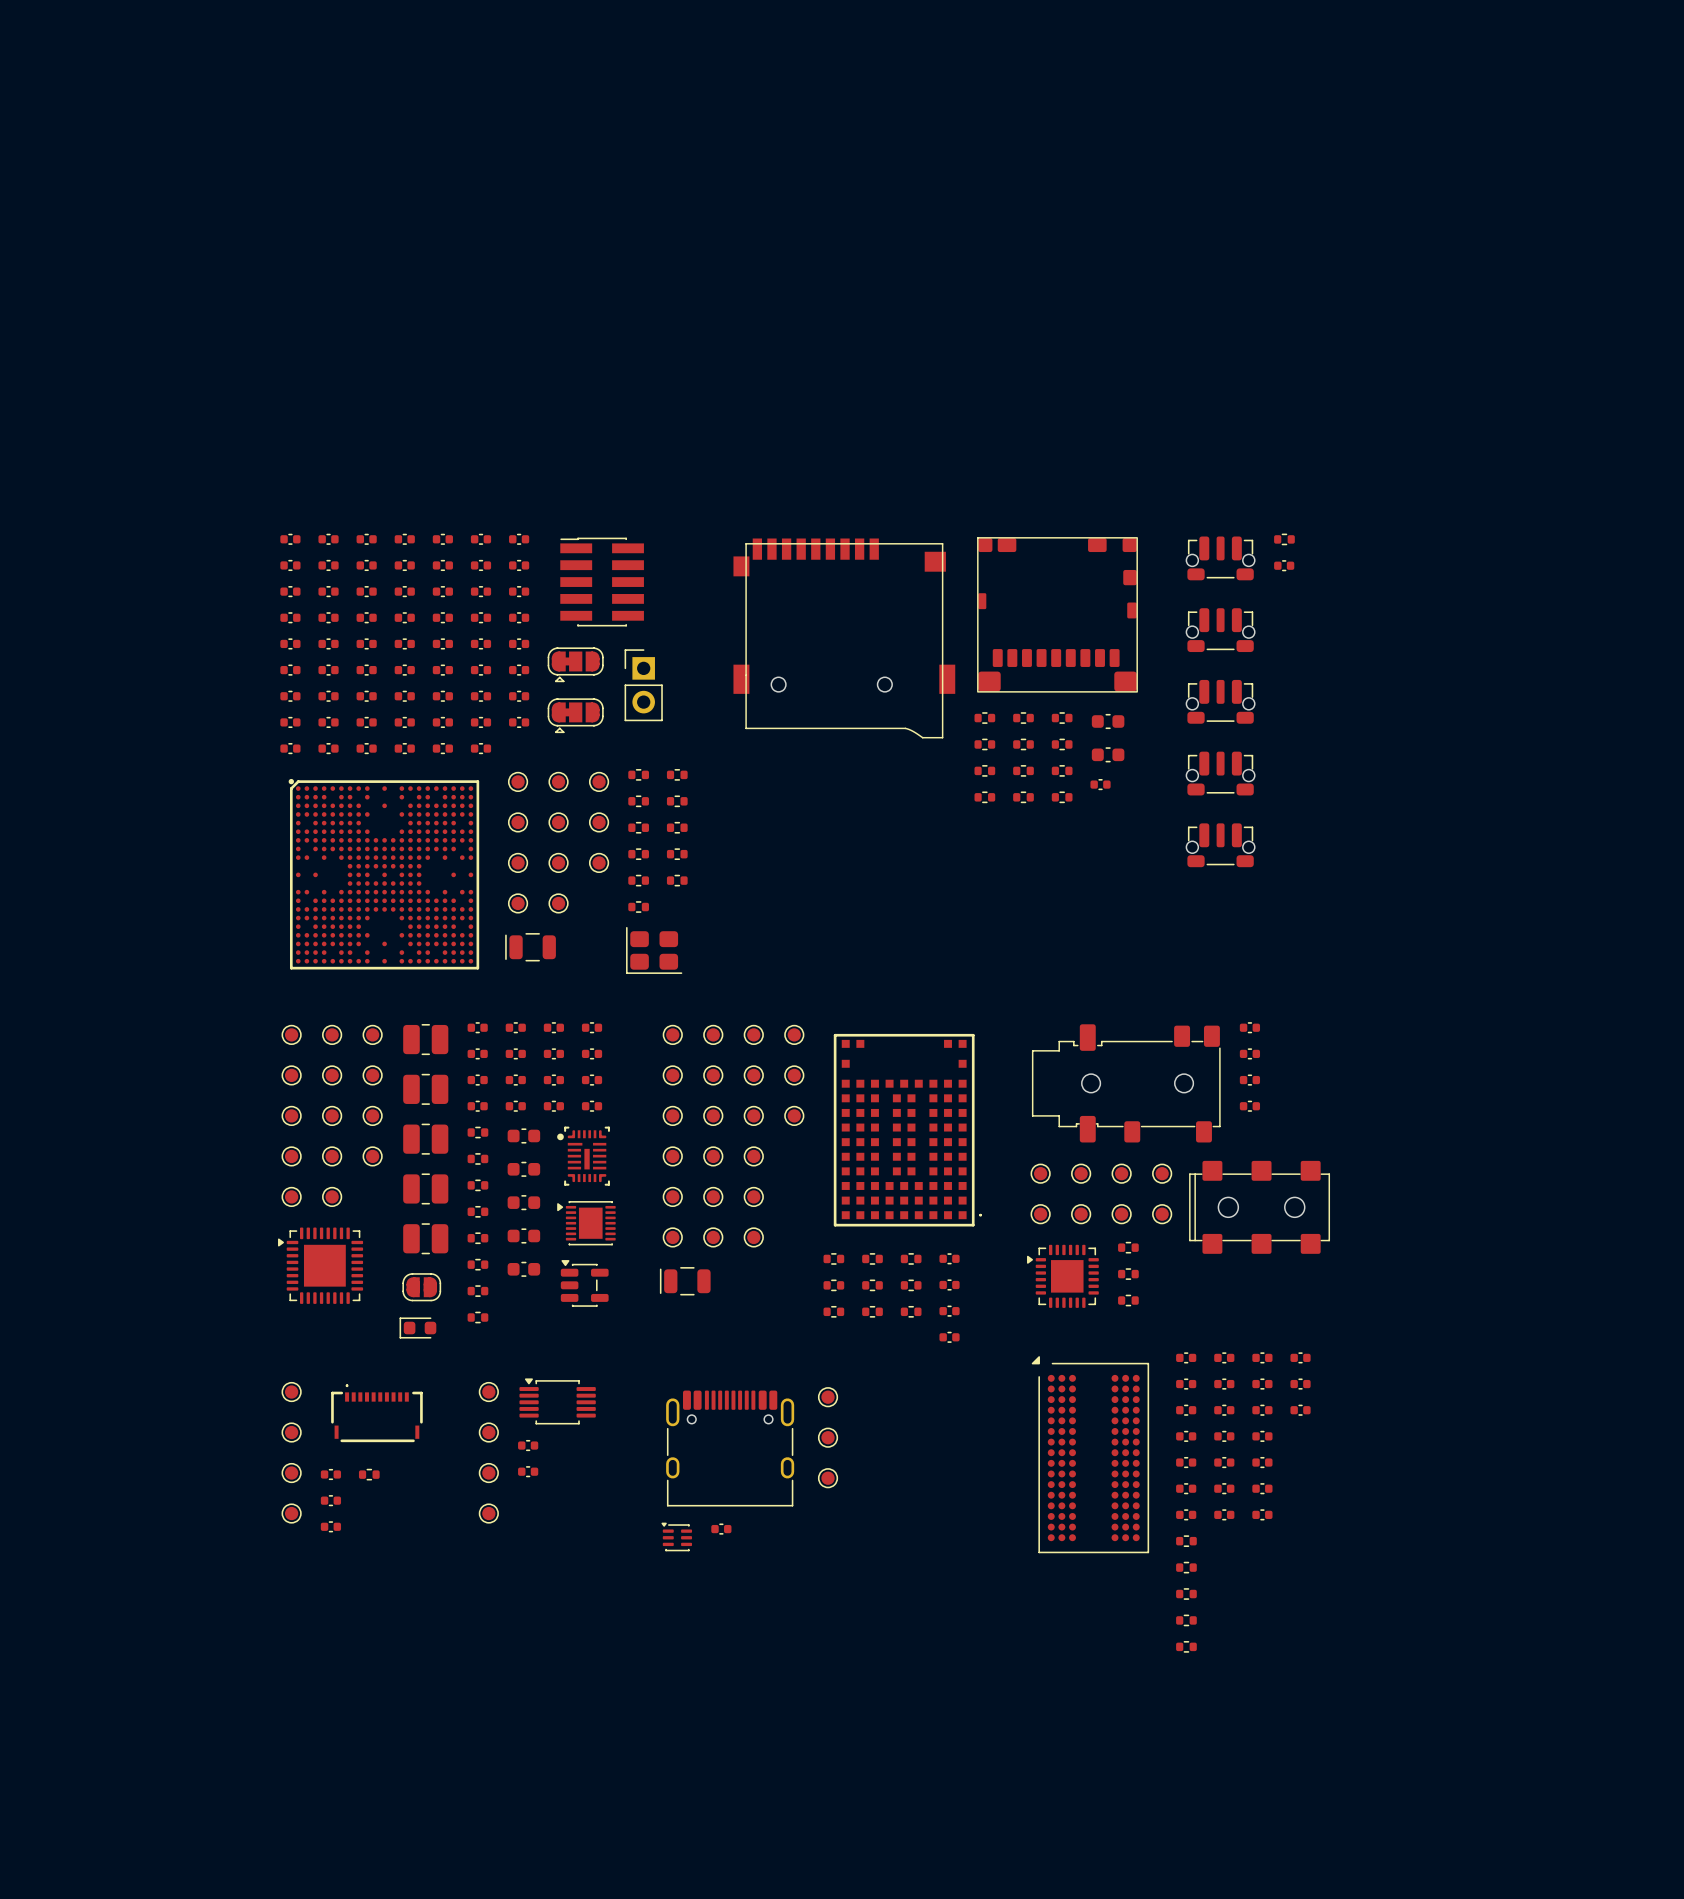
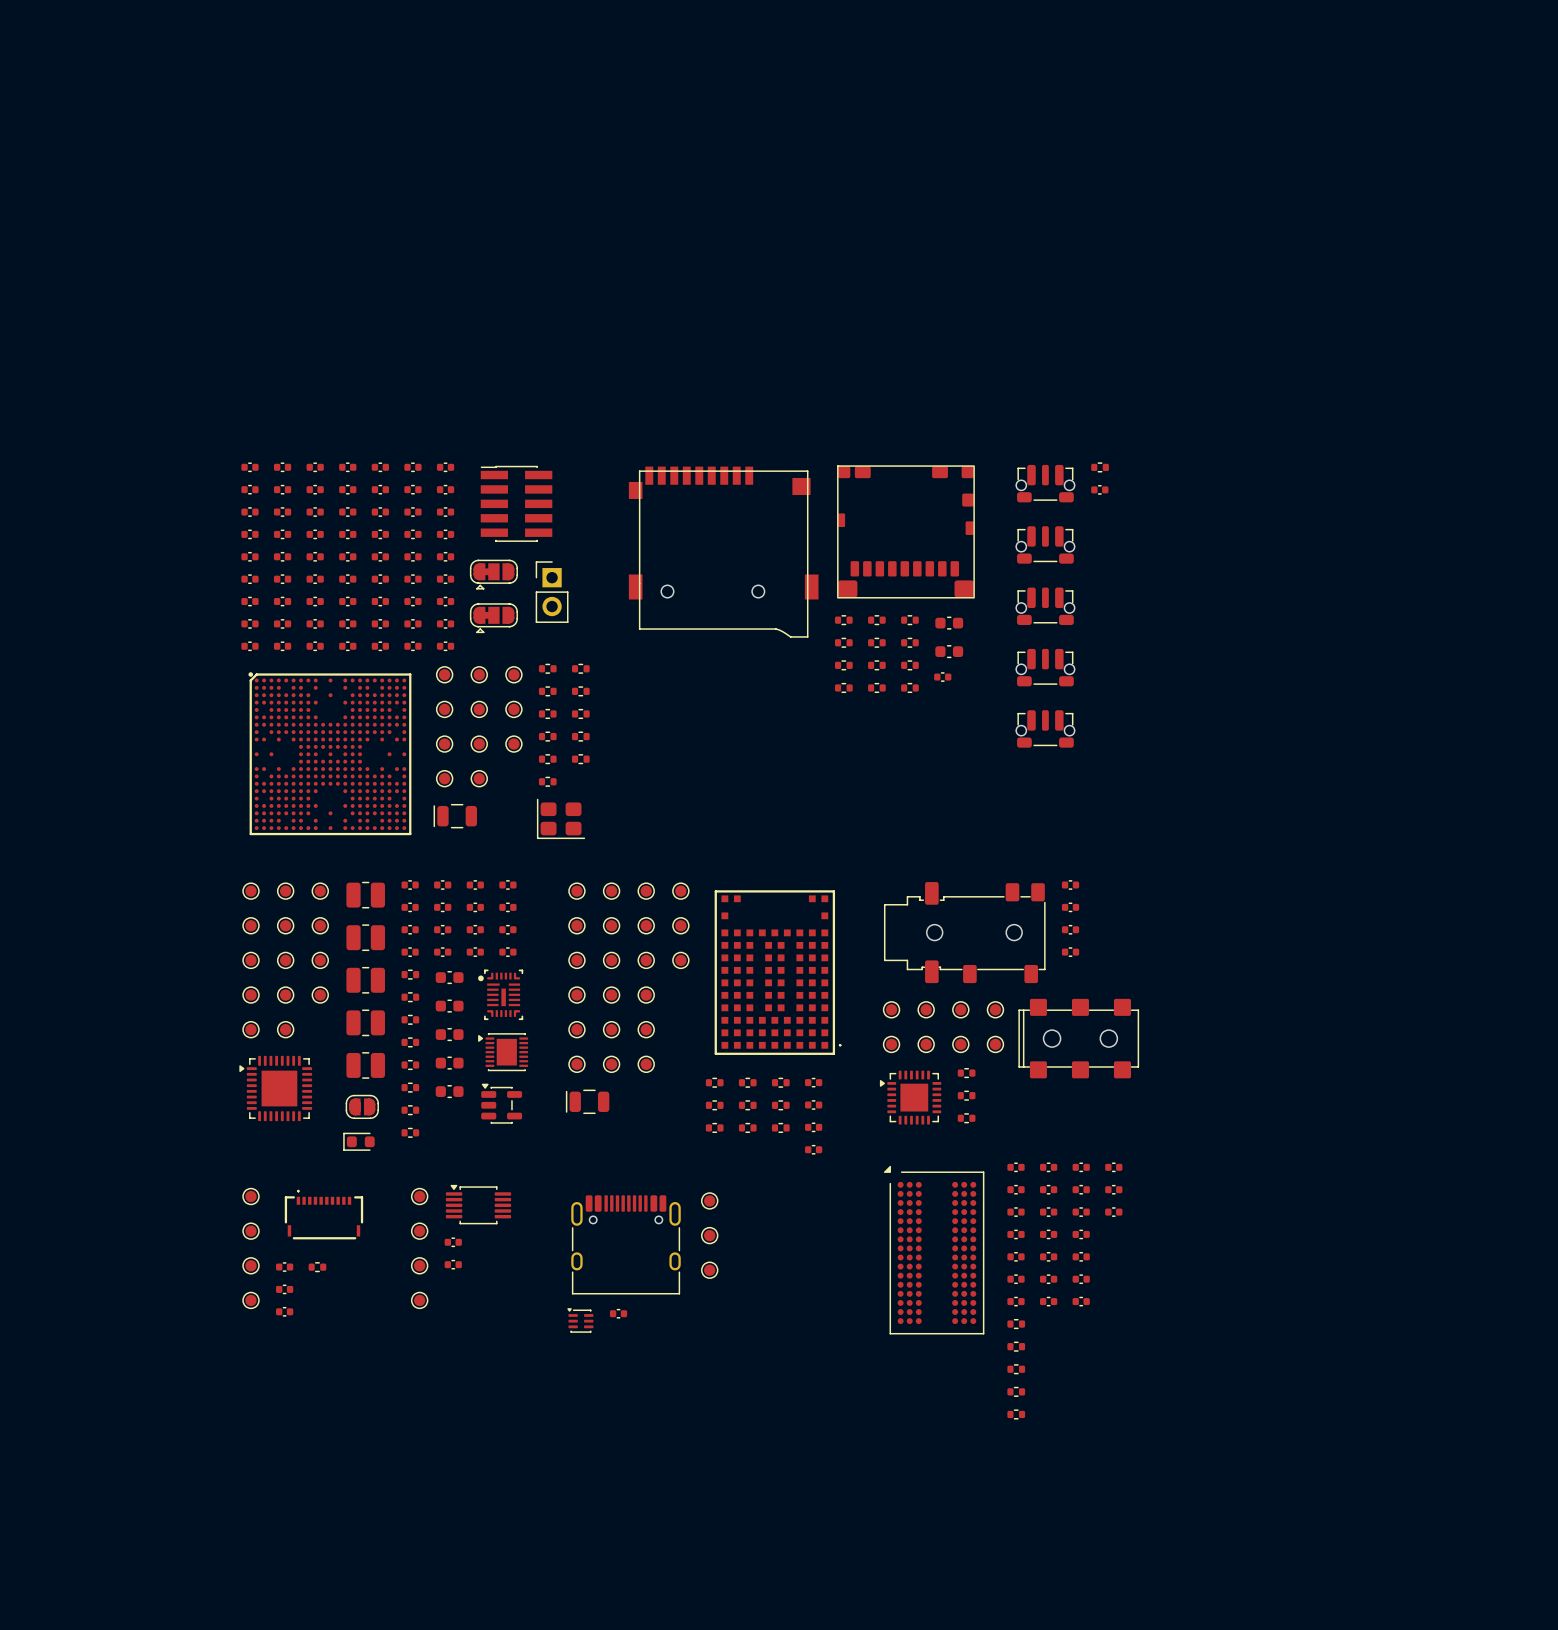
part: none -> (445, 646)

